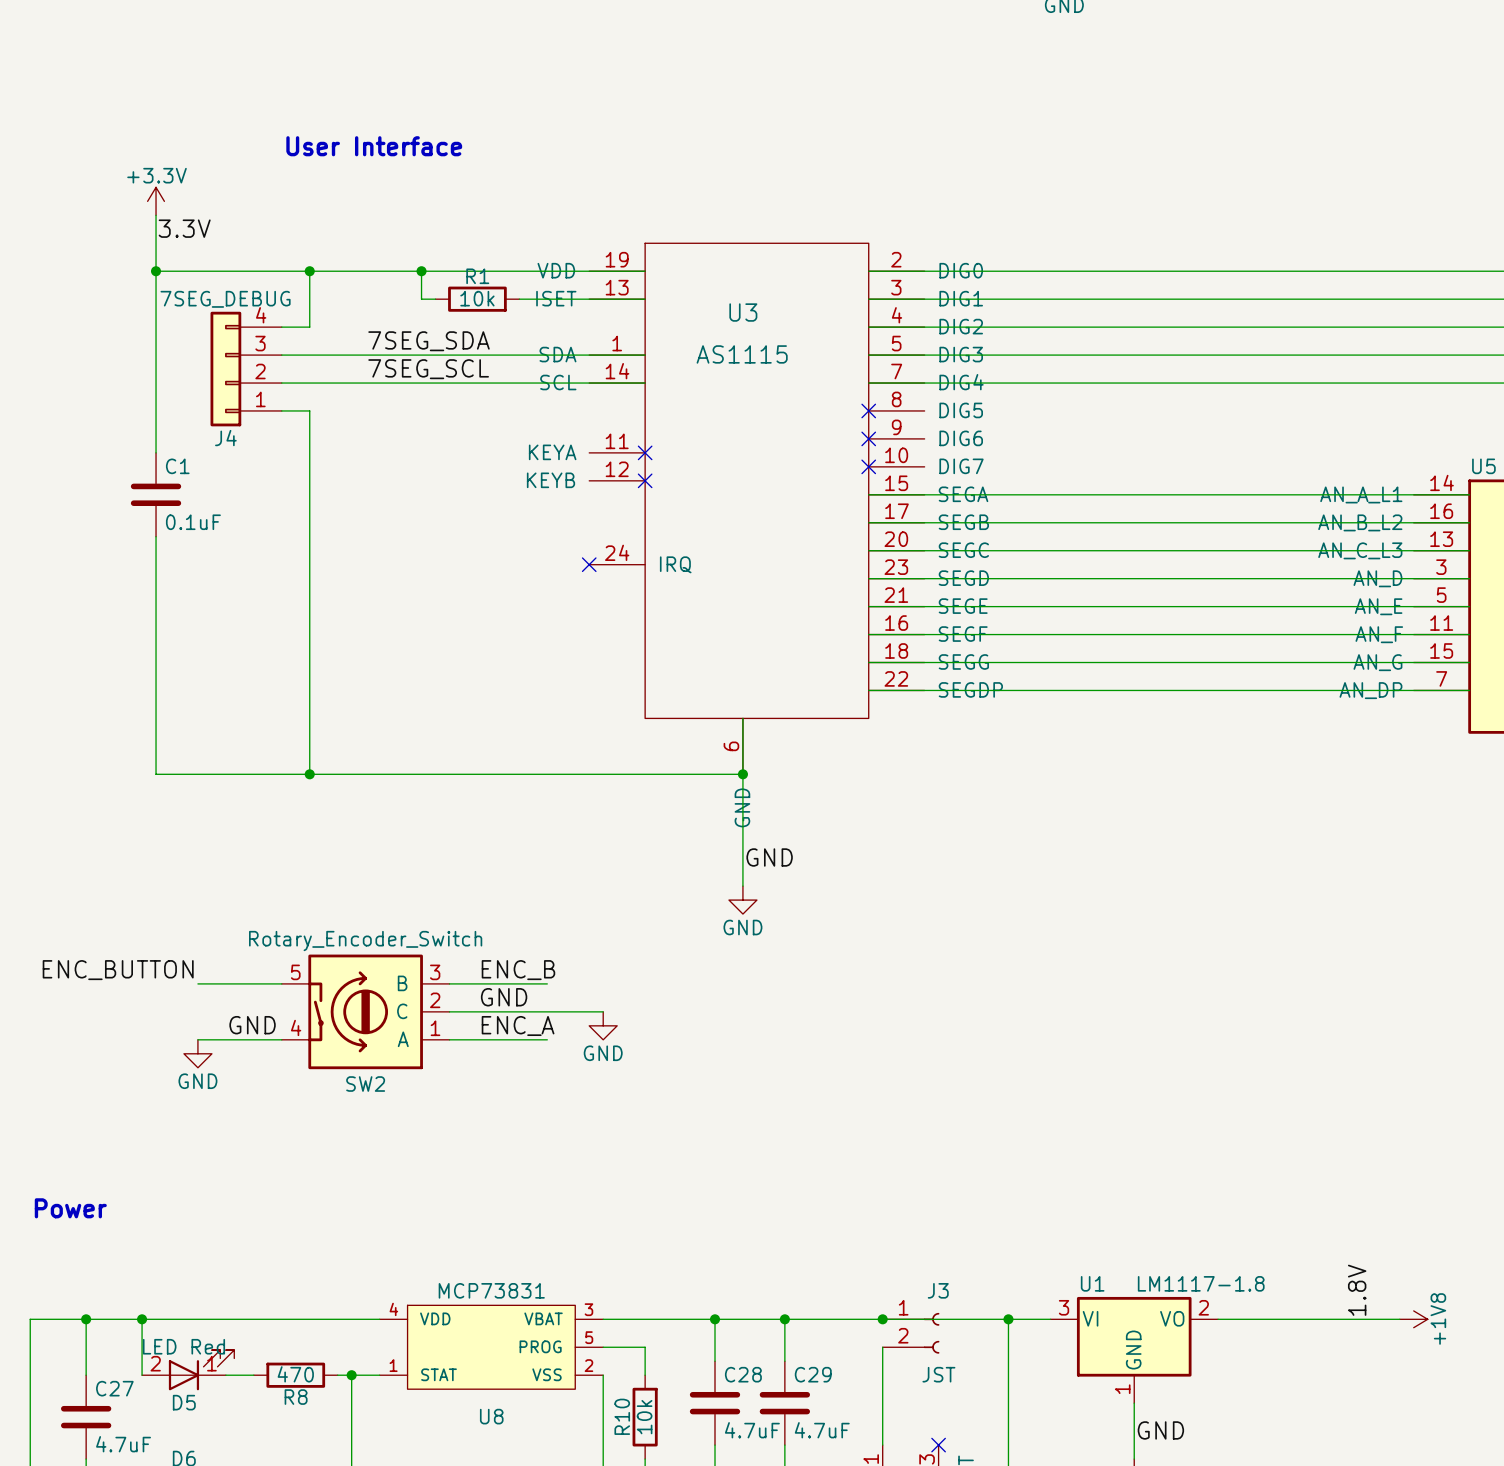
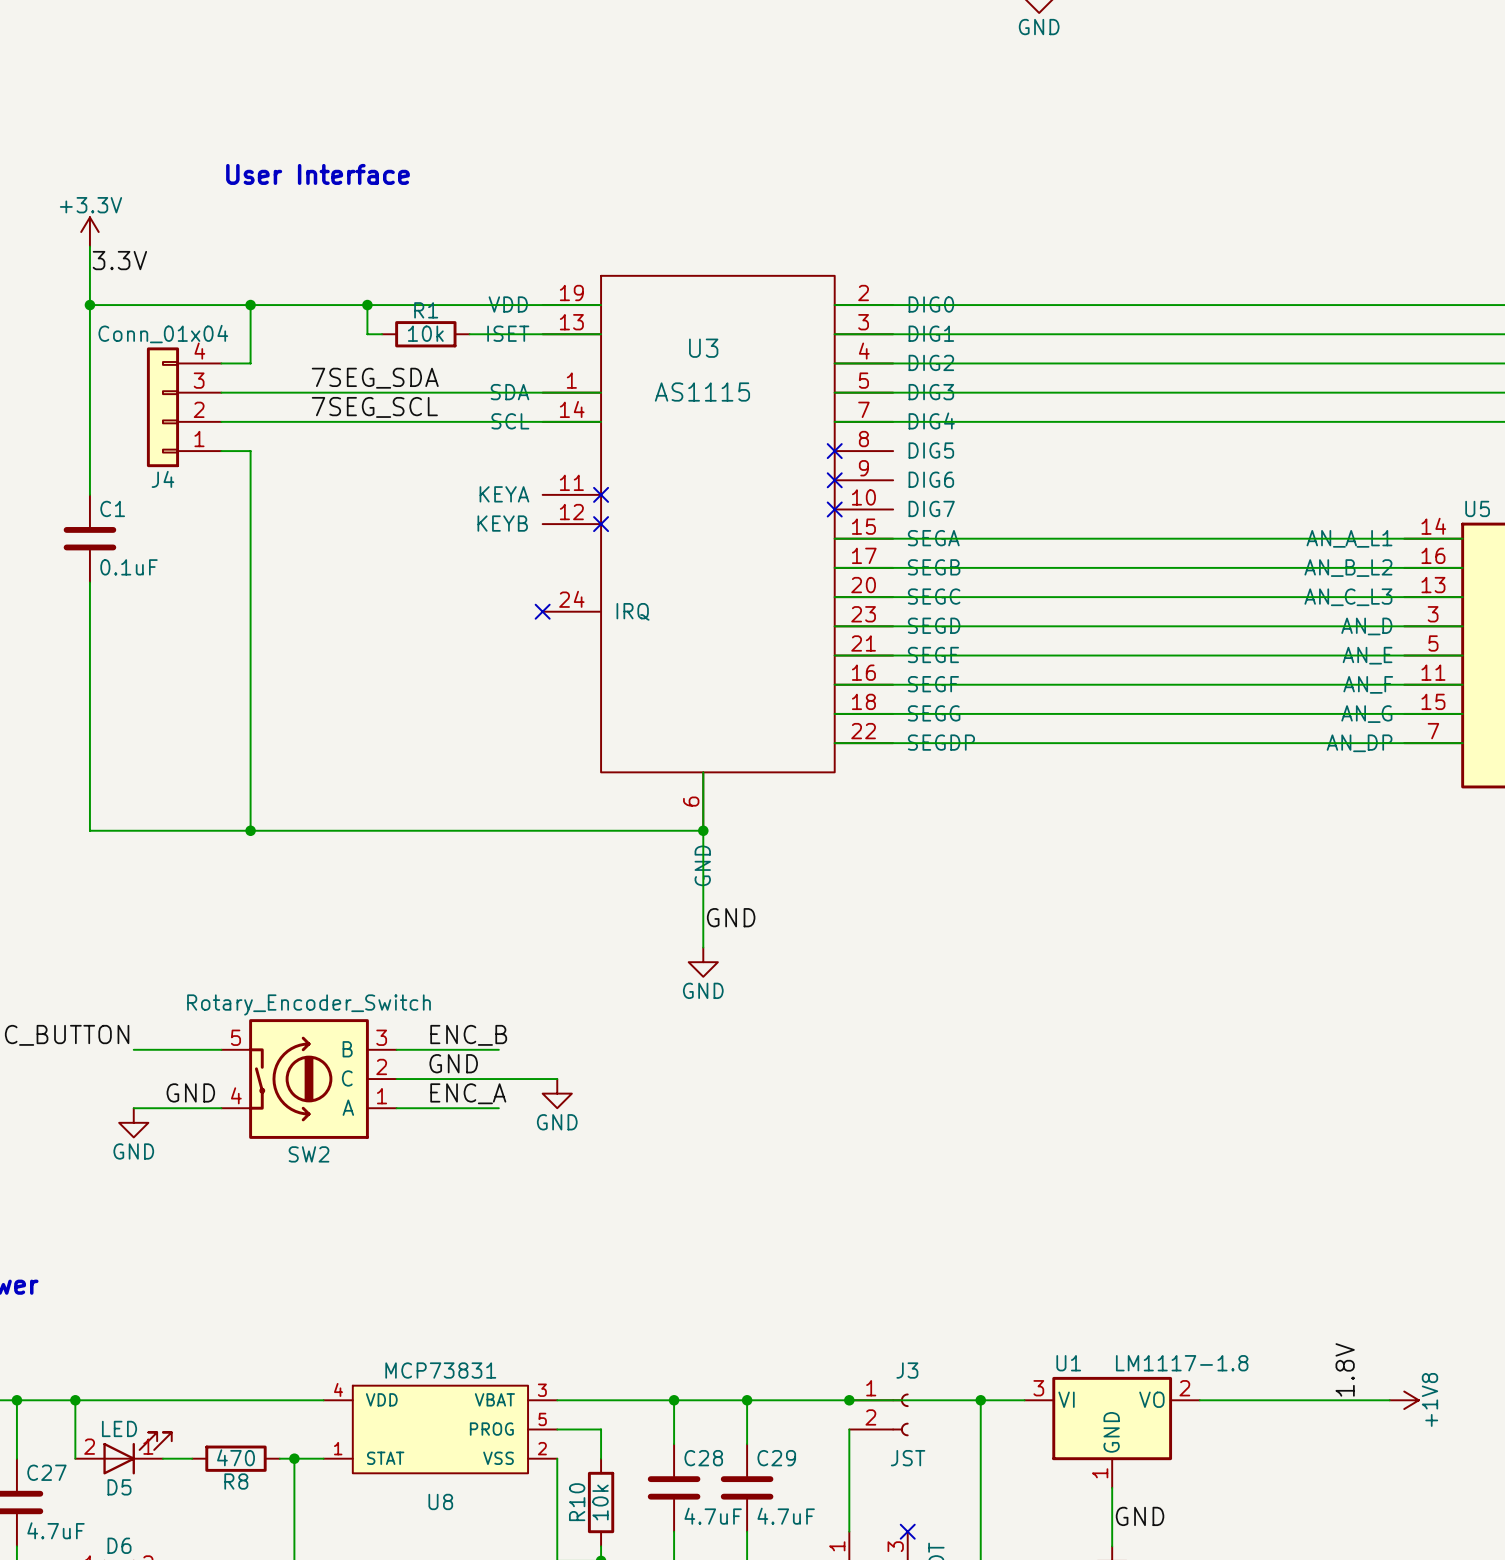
J4 value: 7SEG_DEBUG (225, 299) -> Conn_01x04 (163, 334)
D5 value: LED Red (183, 1346) -> LED (119, 1428)

